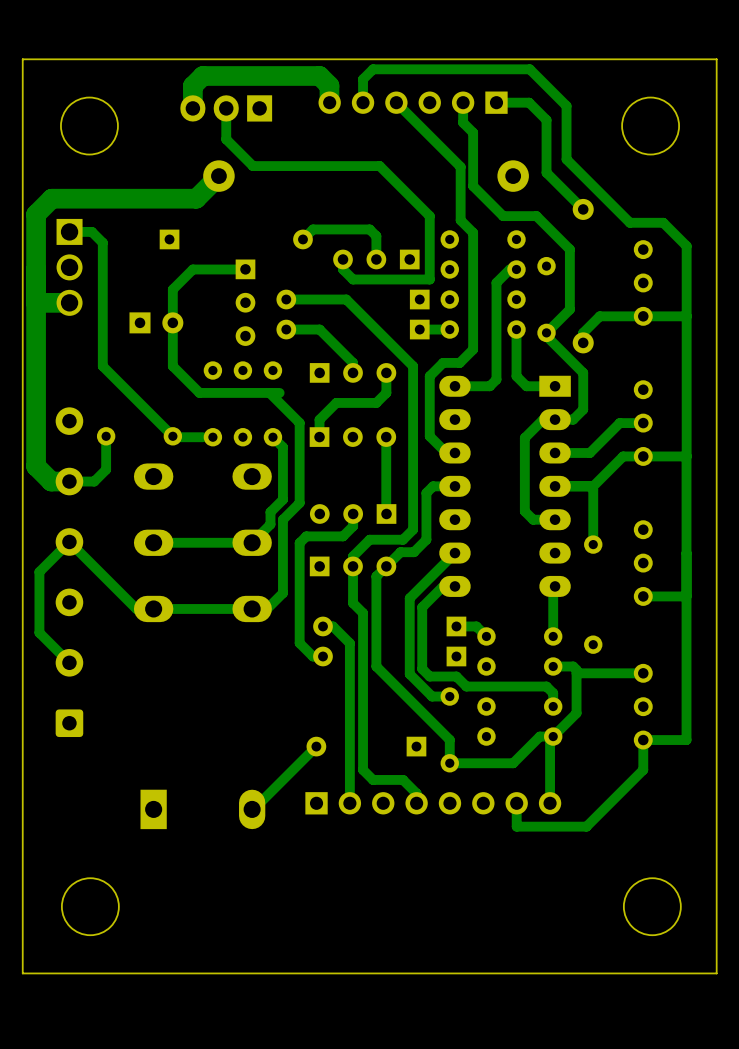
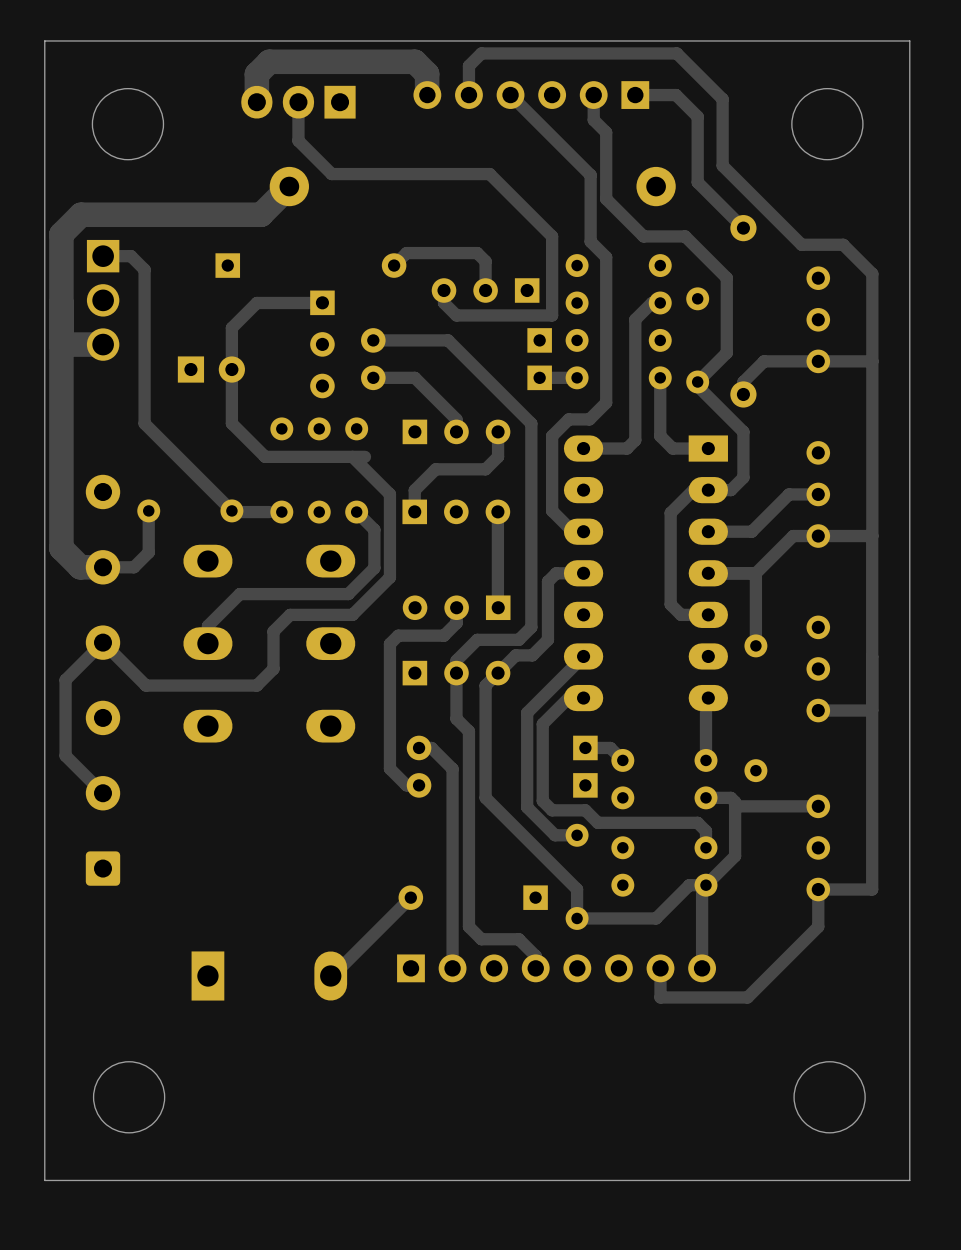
track: (282, 447) (282, 499) (270, 512) (270, 524) (252, 542) (153, 542) -> (369, 524) (374, 529) (374, 568) (348, 594) (239, 594) (207, 626) (207, 643)
track: (299, 489) (299, 503) (282, 519) (282, 593) (267, 608) (136, 608) (103, 576) -> (389, 577) (352, 614) (290, 614) (273, 631) (273, 668) (256, 685) (145, 685)

